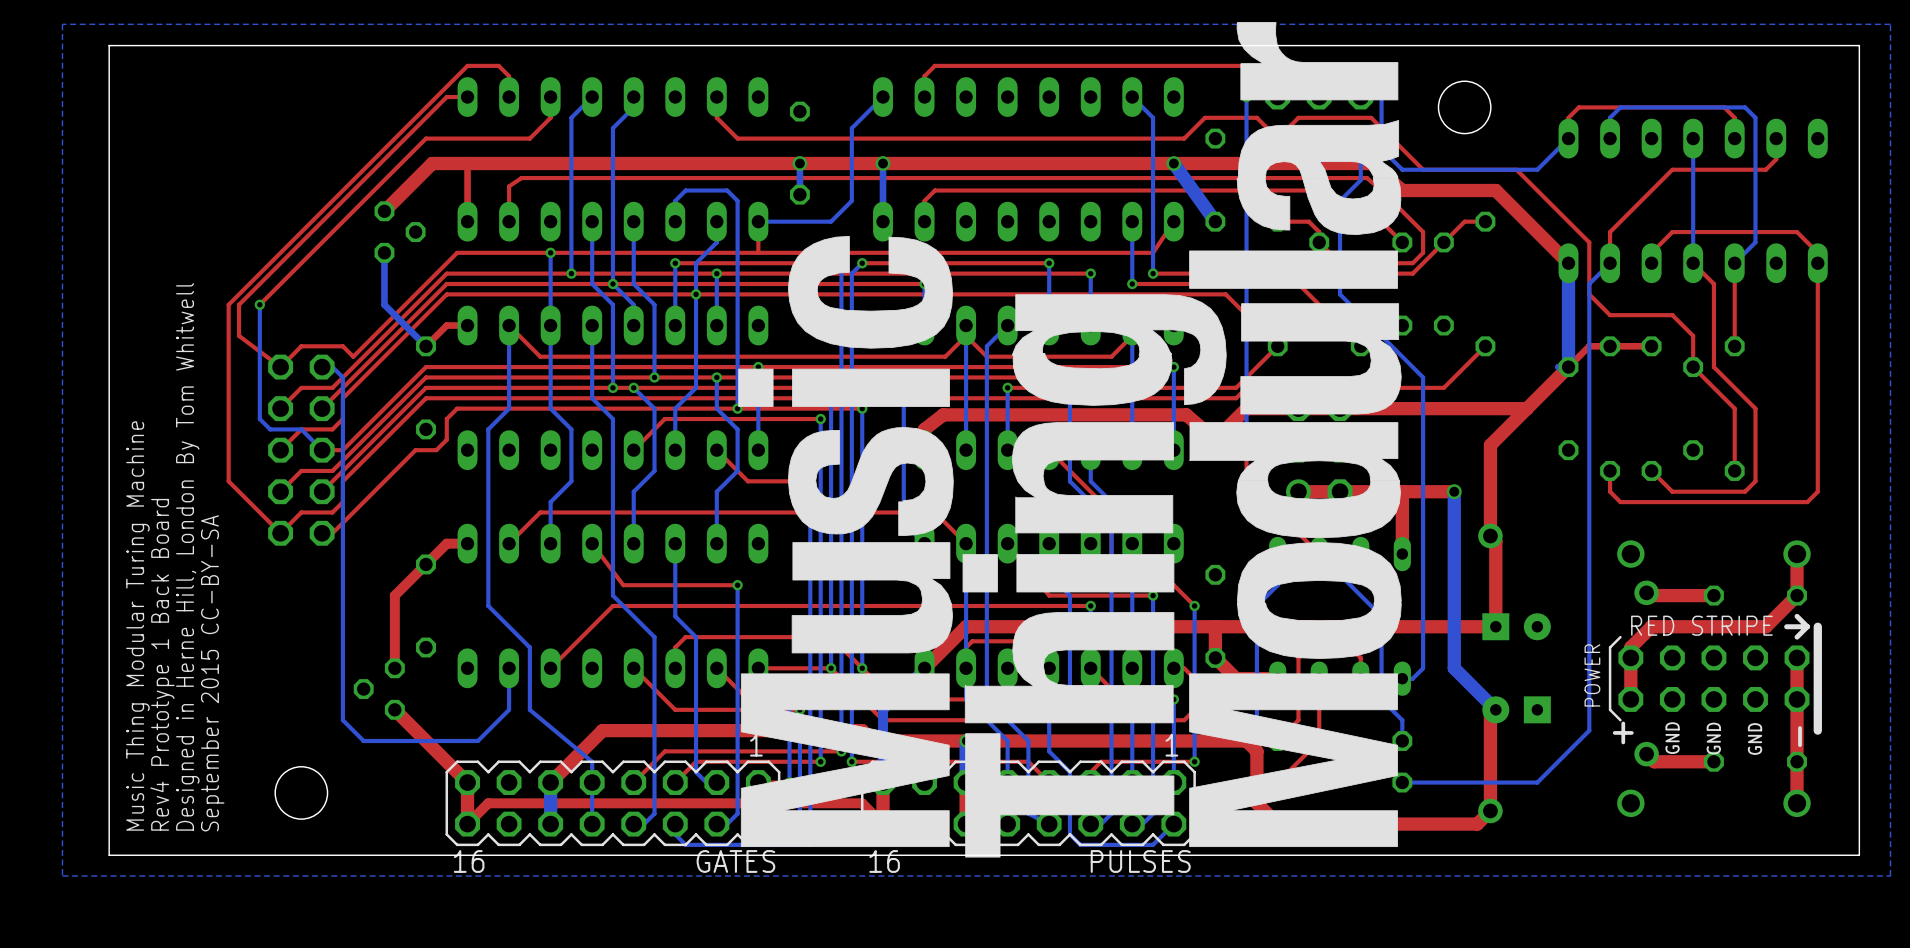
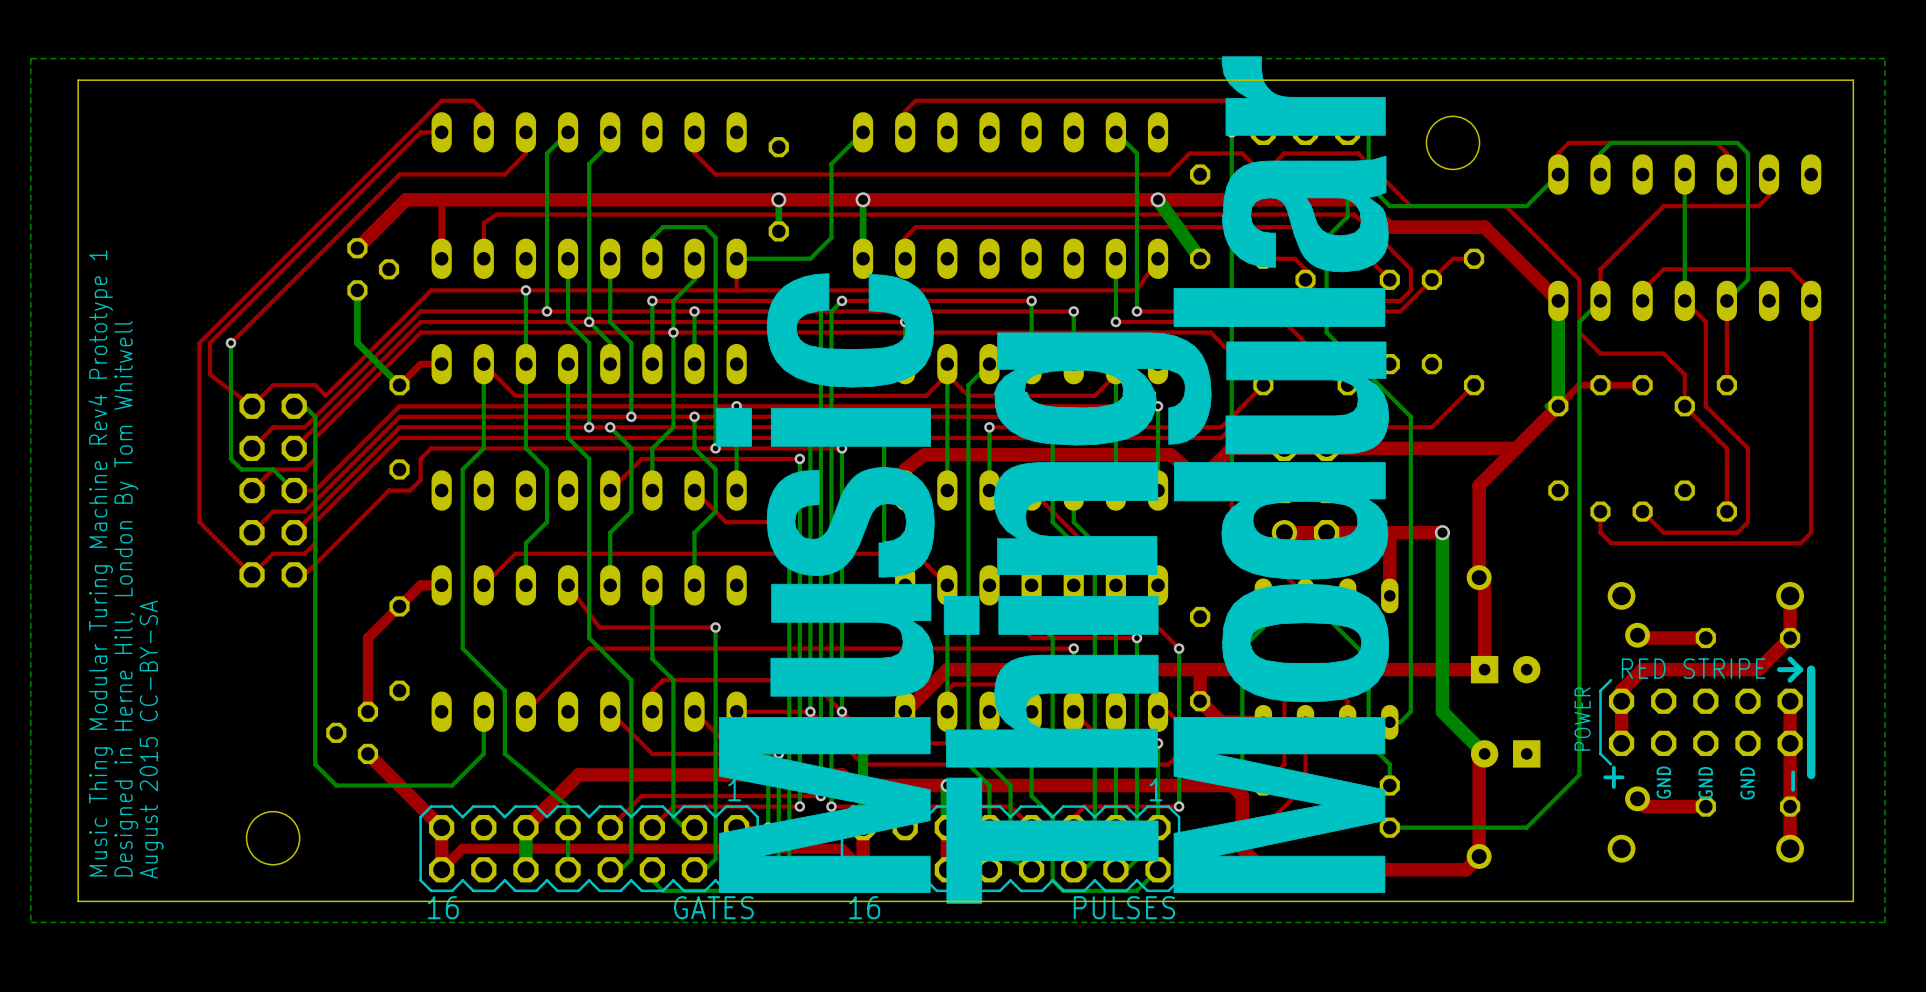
text: Designed in Herne Hill, London By Tom Whitwell (187, 556) -> August 2015 CC-BY-SA (151, 739)
text: Music Thing Modular Turing Machine (137, 625) -> Music Thing Modular Turing Machine Rev4 Prototype 1 (100, 563)
text: Rev4 Prototype 1 Back Board (162, 664) -> Designed in Herne Hill, London By Tom Whitwell (126, 598)
text: September 2015 CC-BY-SA (212, 673) -> none

